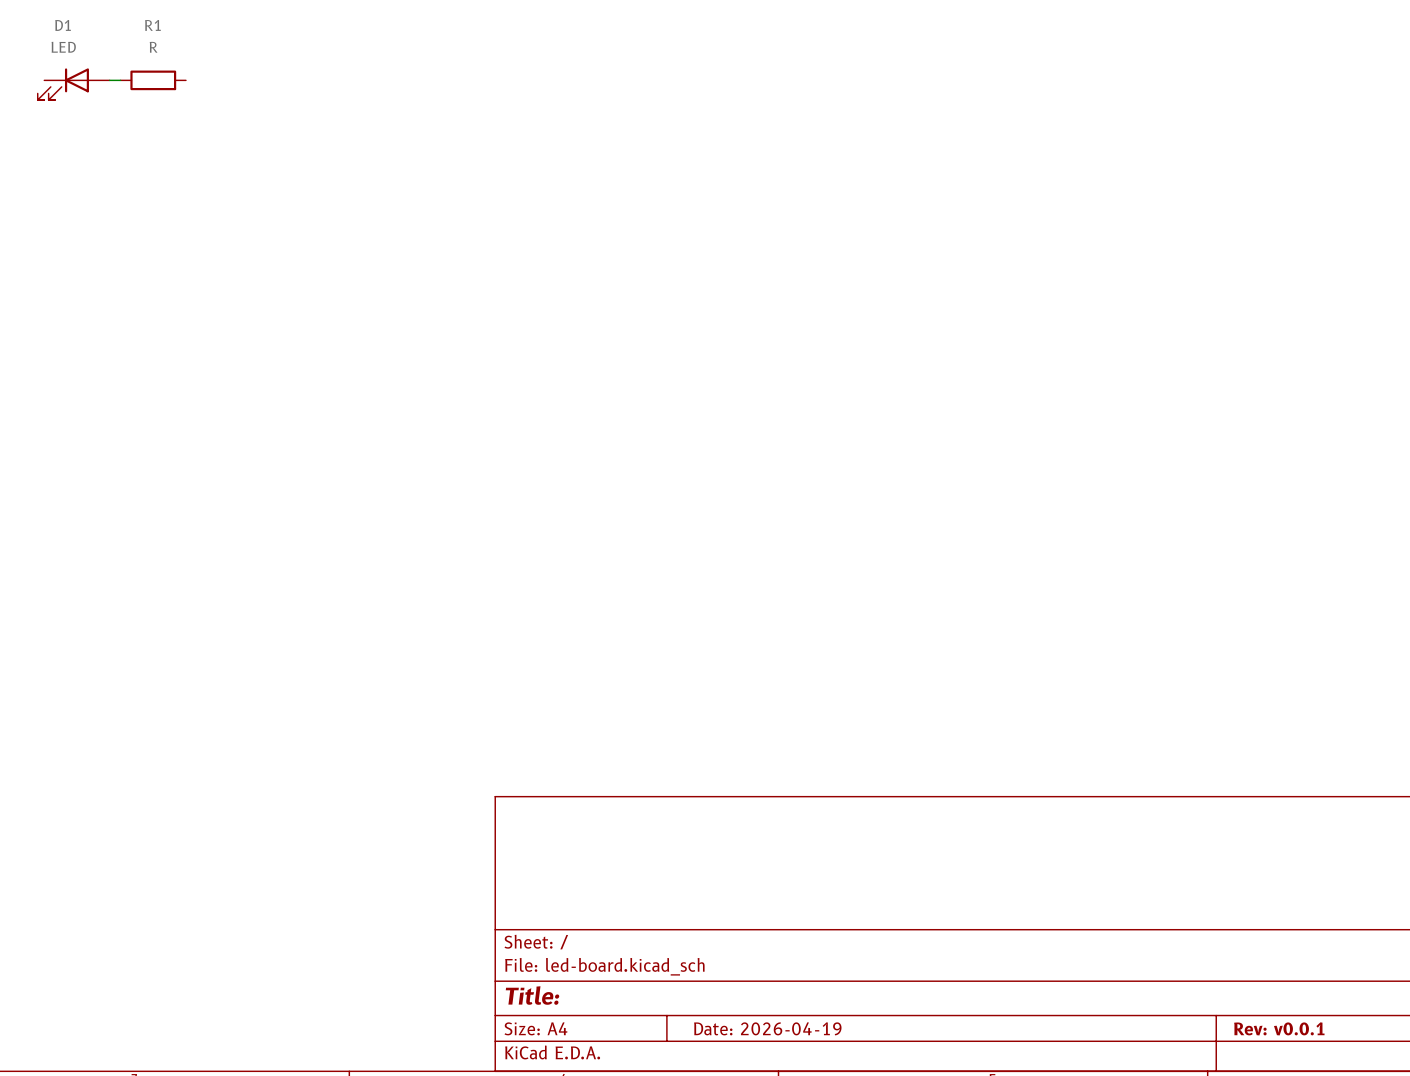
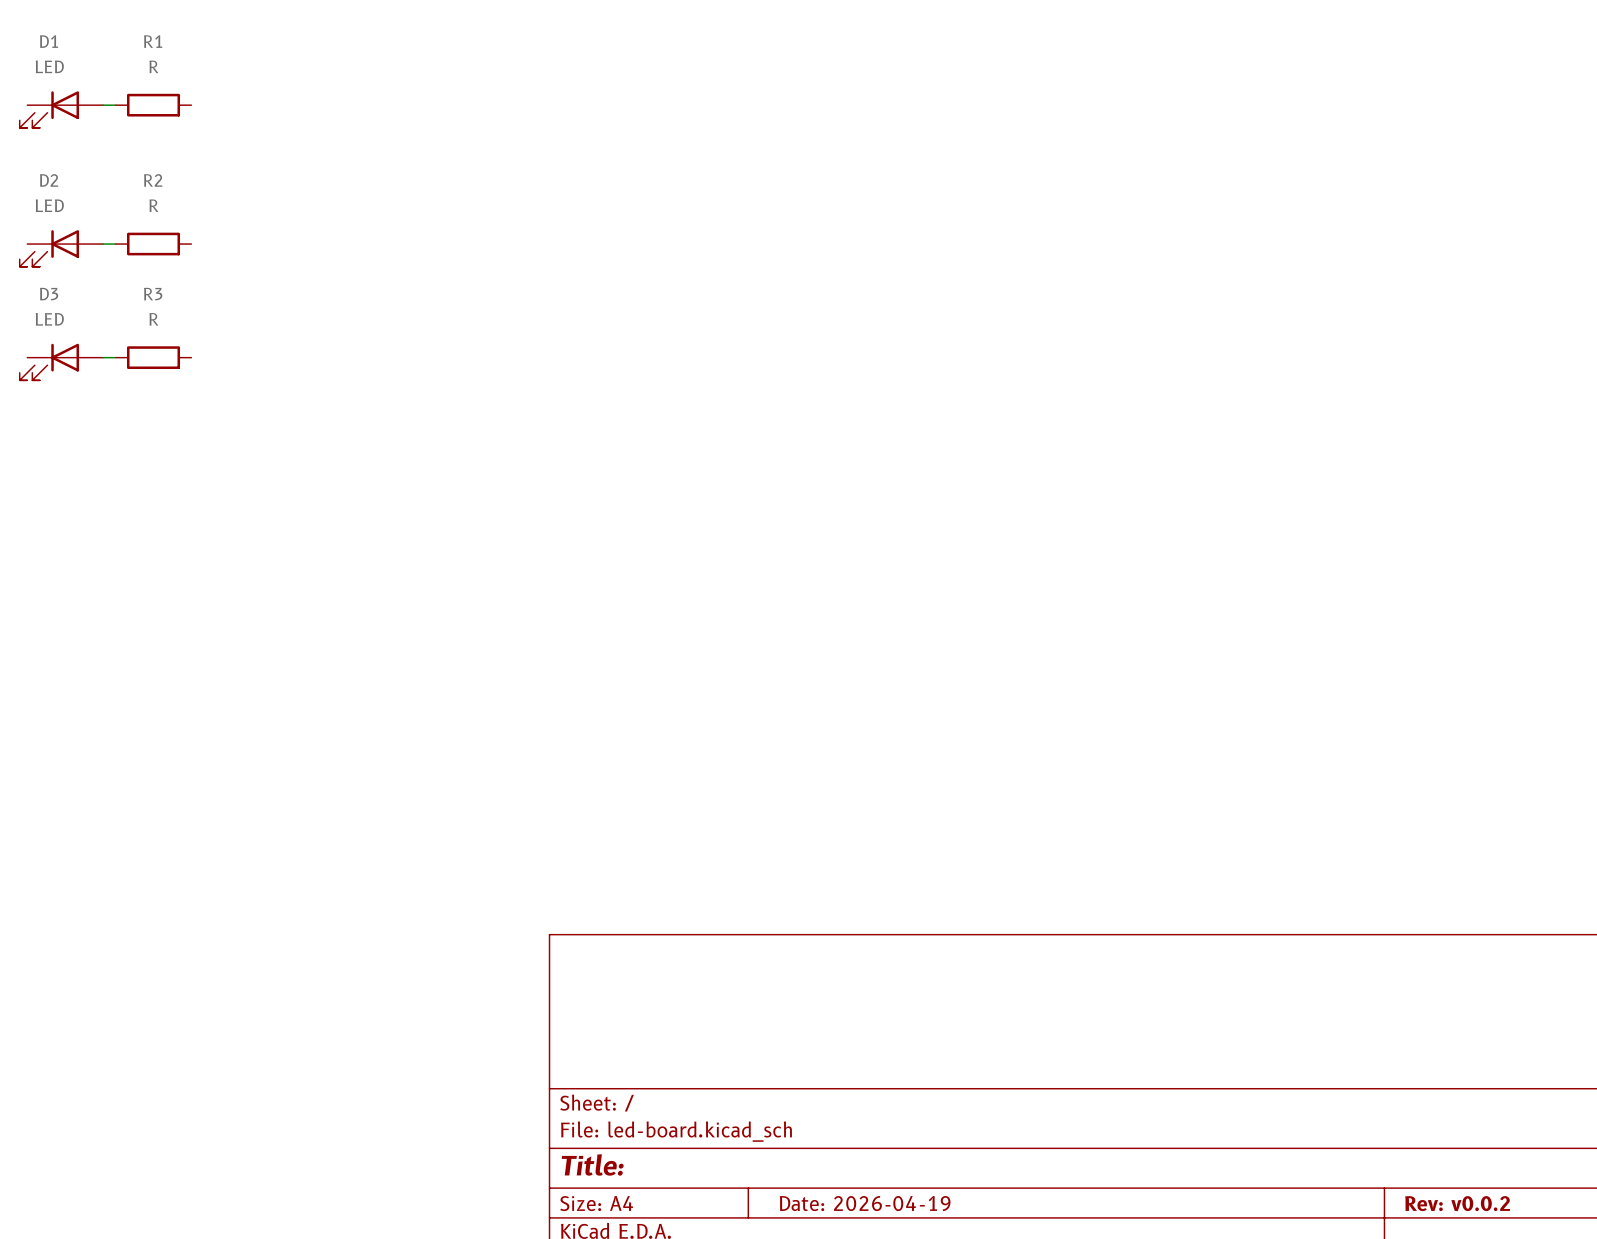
wire: none -> (103, 244) (115, 244)
R2: none -> R (153, 244)
D2: none -> LED (61, 248)
wire: none -> (103, 357) (115, 357)
R3: none -> R (153, 357)
D3: none -> LED (61, 362)
title block: Rev: v0.0.1 (1279, 1028) -> Rev: v0.0.2 (1457, 1203)

